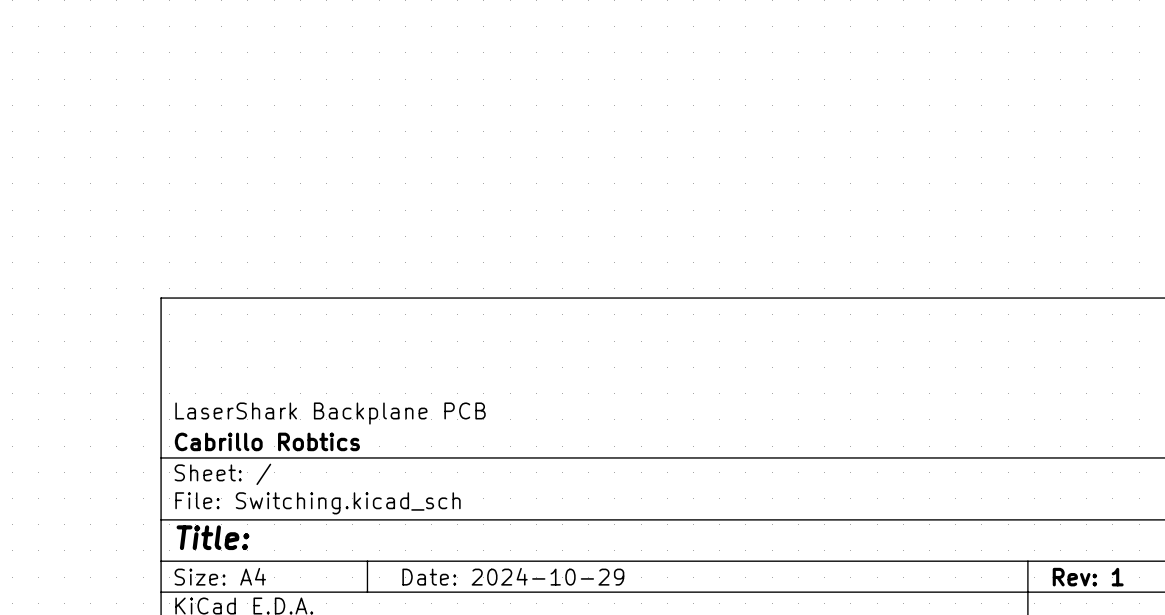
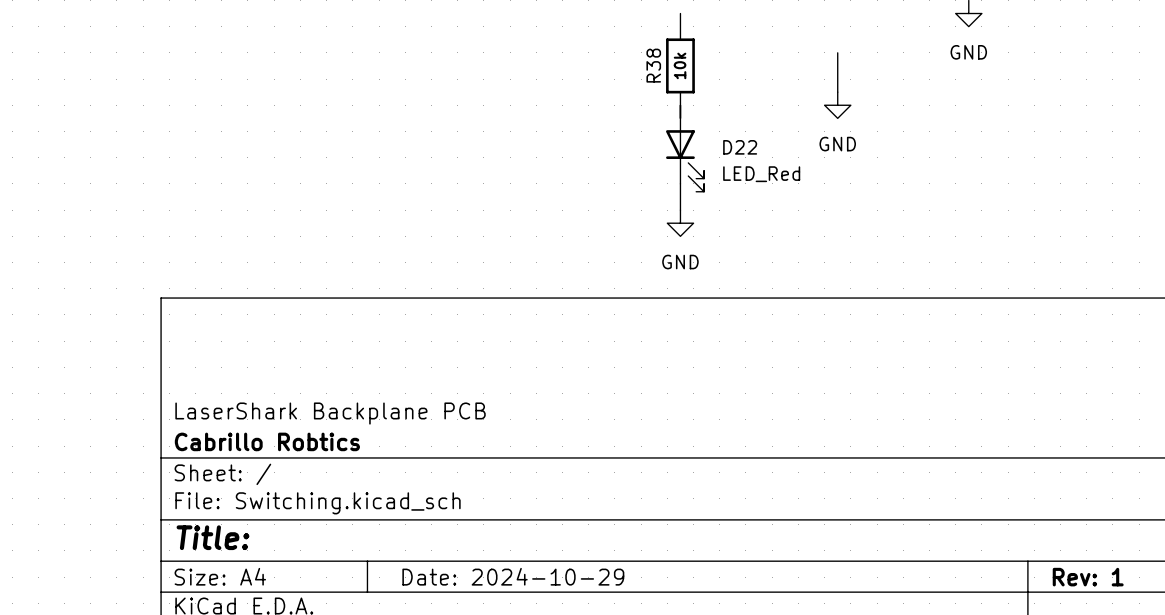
power symbol: none -> GND (968, 13)
wire: none -> (837, 52) (837, 92)
R38: none -> 10k (680, 65)
power symbol: none -> GND (837, 105)
D22: none -> LED_Red (685, 148)
wire: none -> (680, 183) (680, 210)
power symbol: none -> GND (680, 223)

